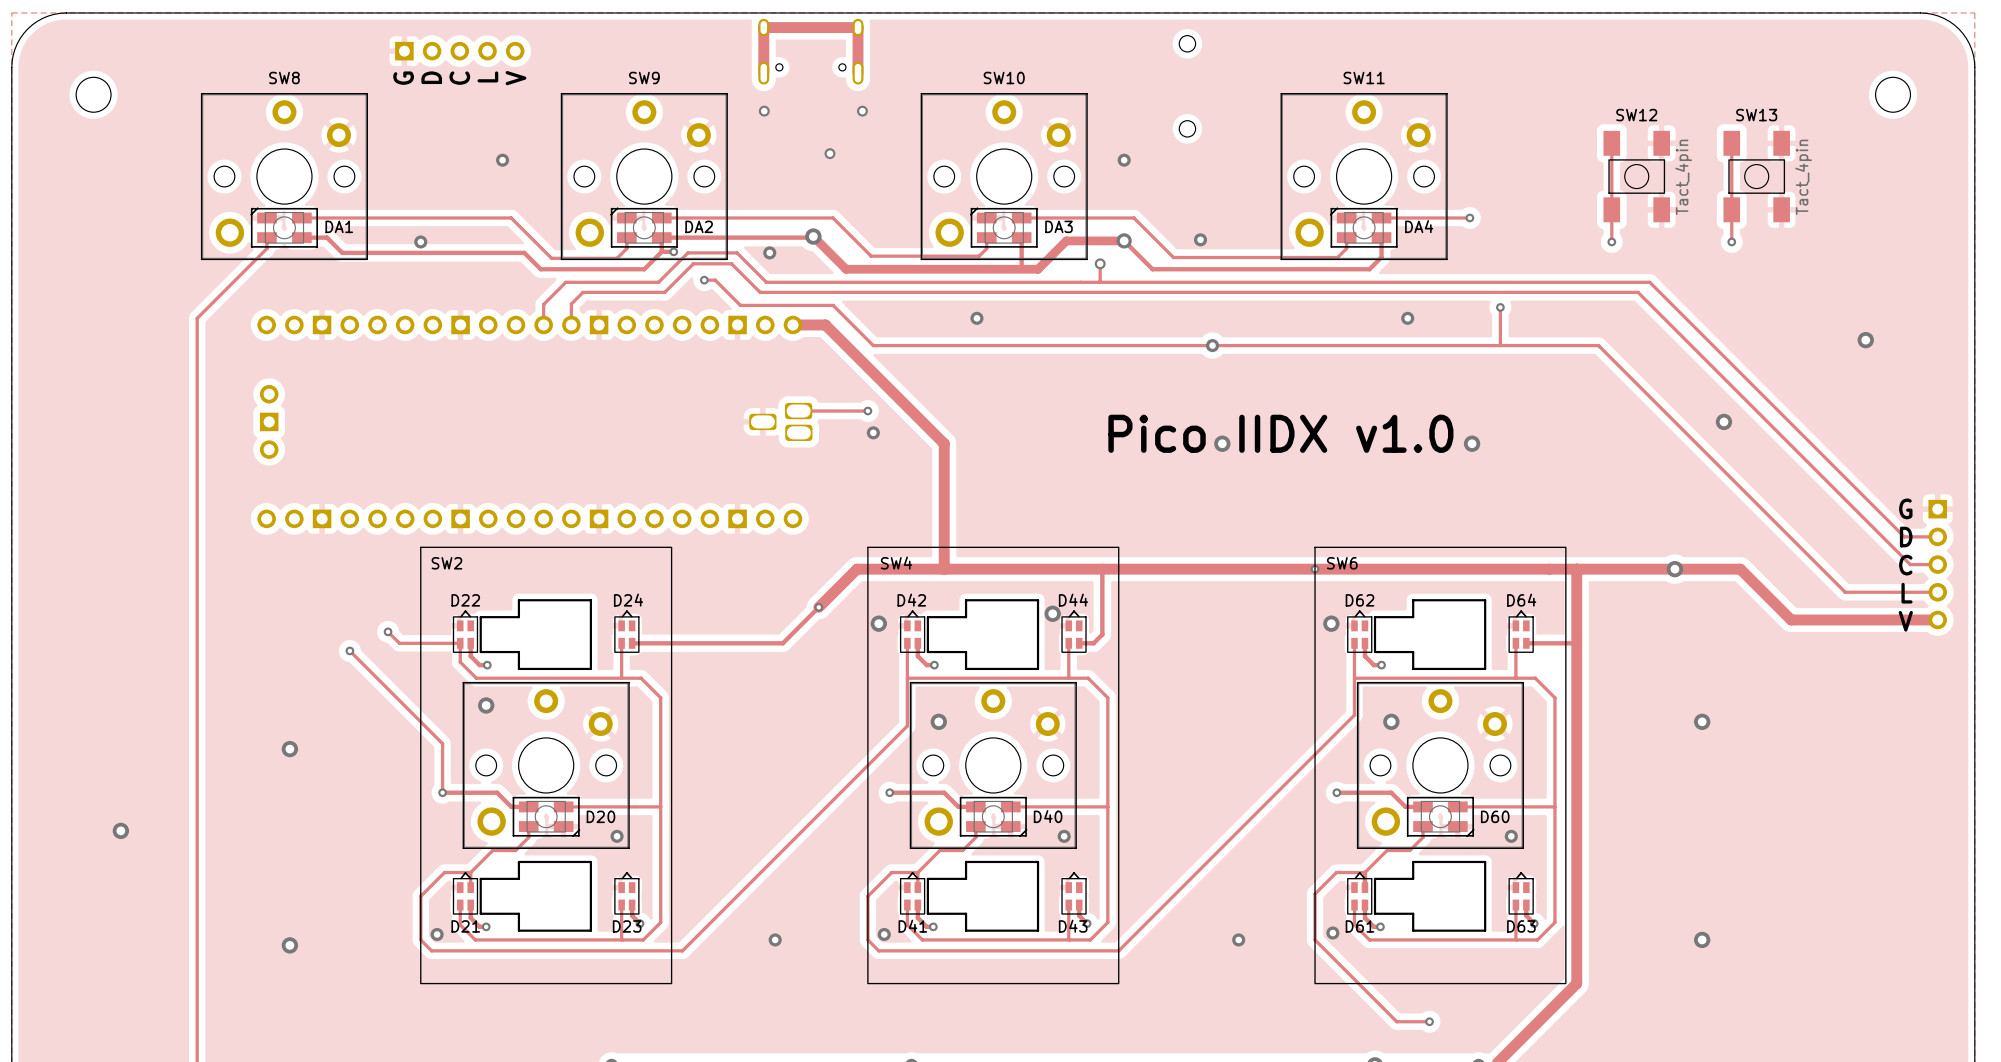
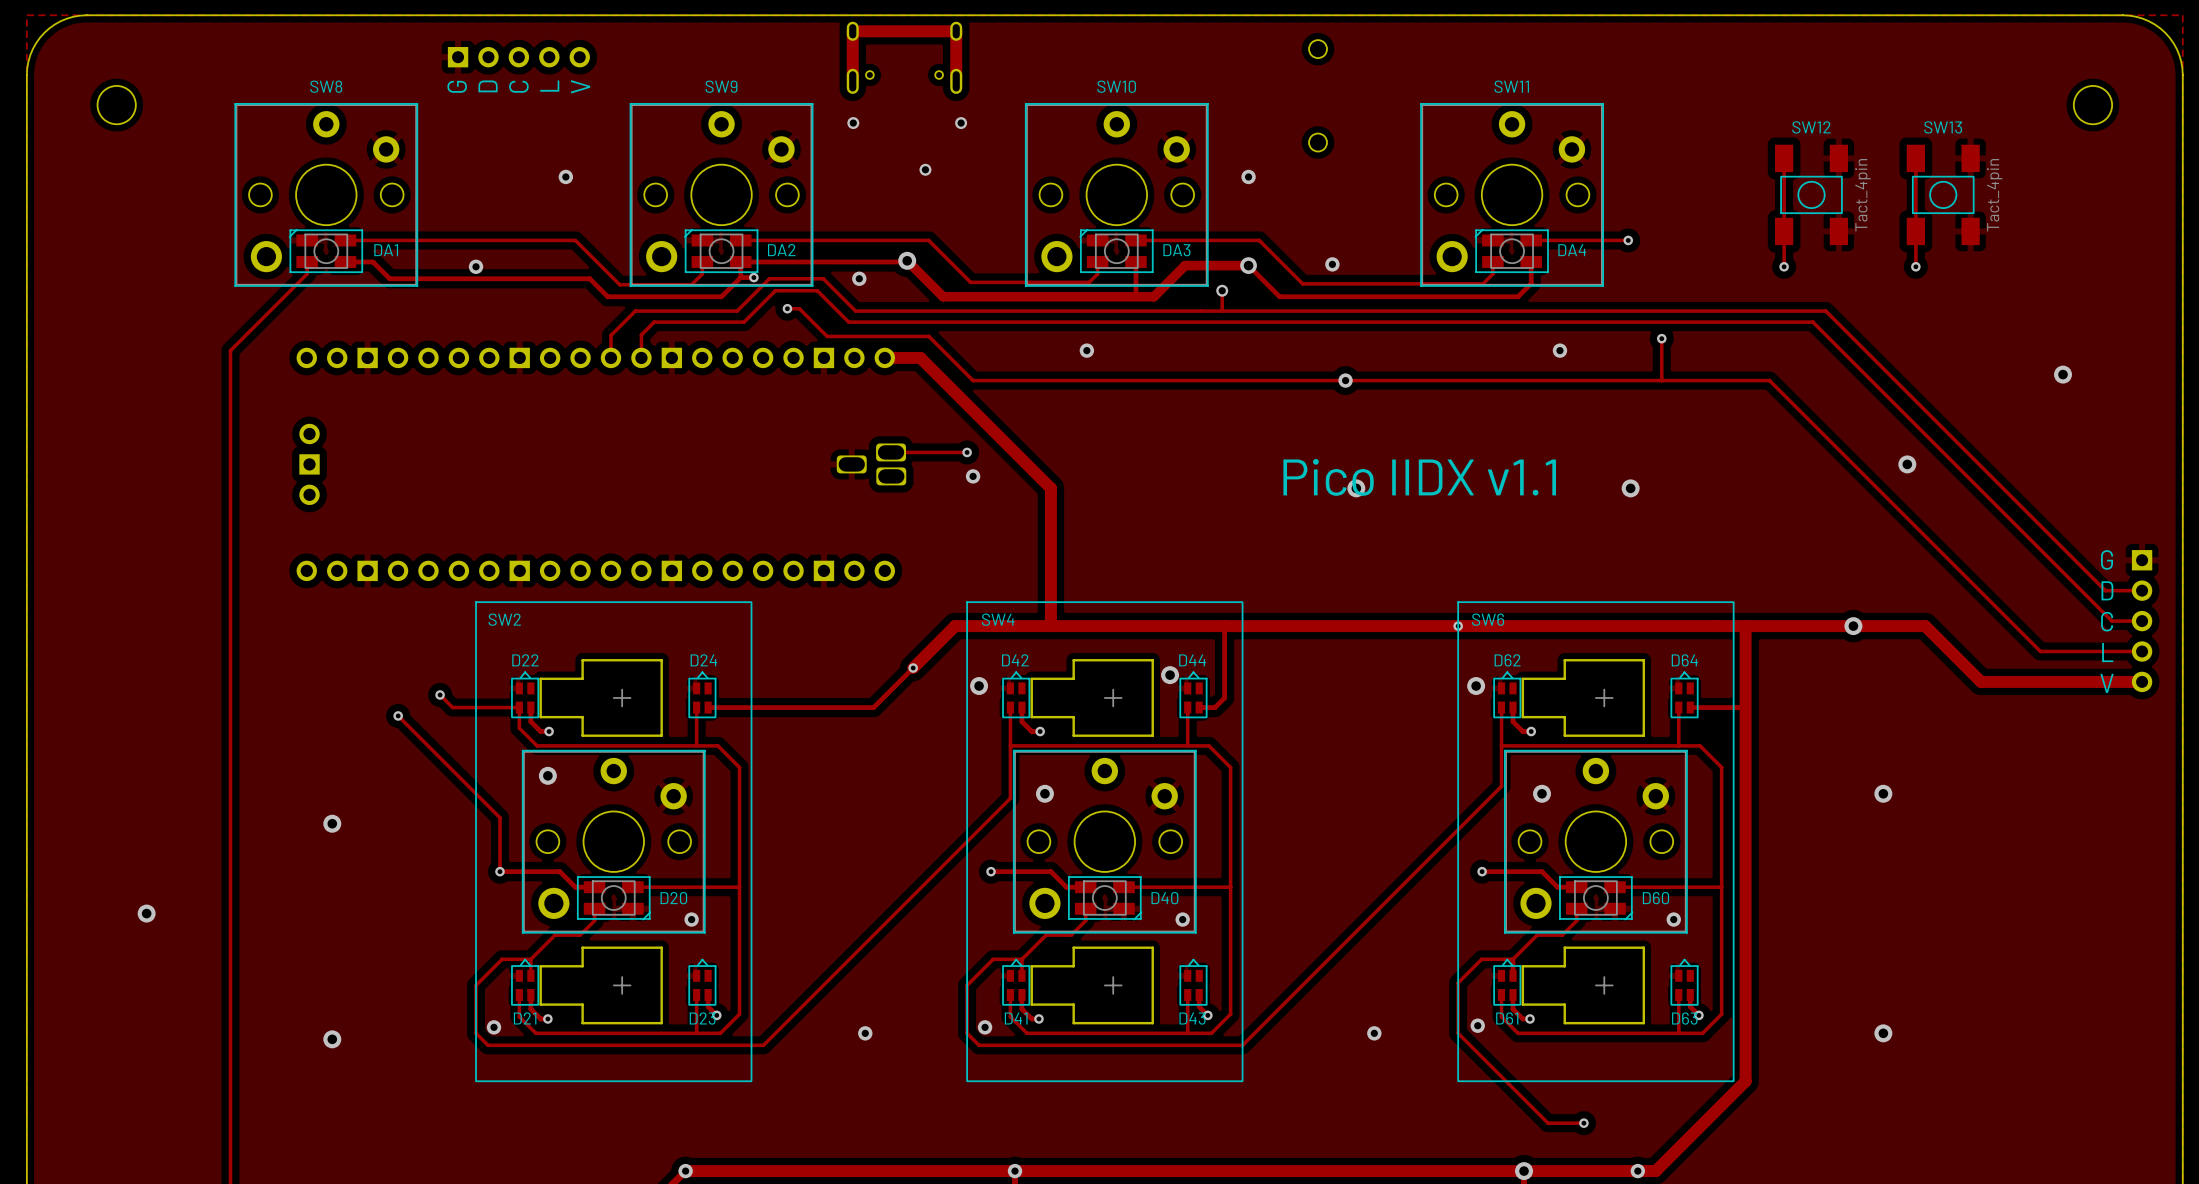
text: Pico IIDX v1.0 (1280, 433) -> Pico IIDX v1.1 (1419, 477)
SW2 footprint: [420, 546, 673, 985] -> [475, 601, 753, 1082]
SW4 footprint: [867, 546, 1120, 985] -> [966, 601, 1244, 1082]
SW6 footprint: [1314, 546, 1567, 985] -> [1457, 601, 1735, 1082]

